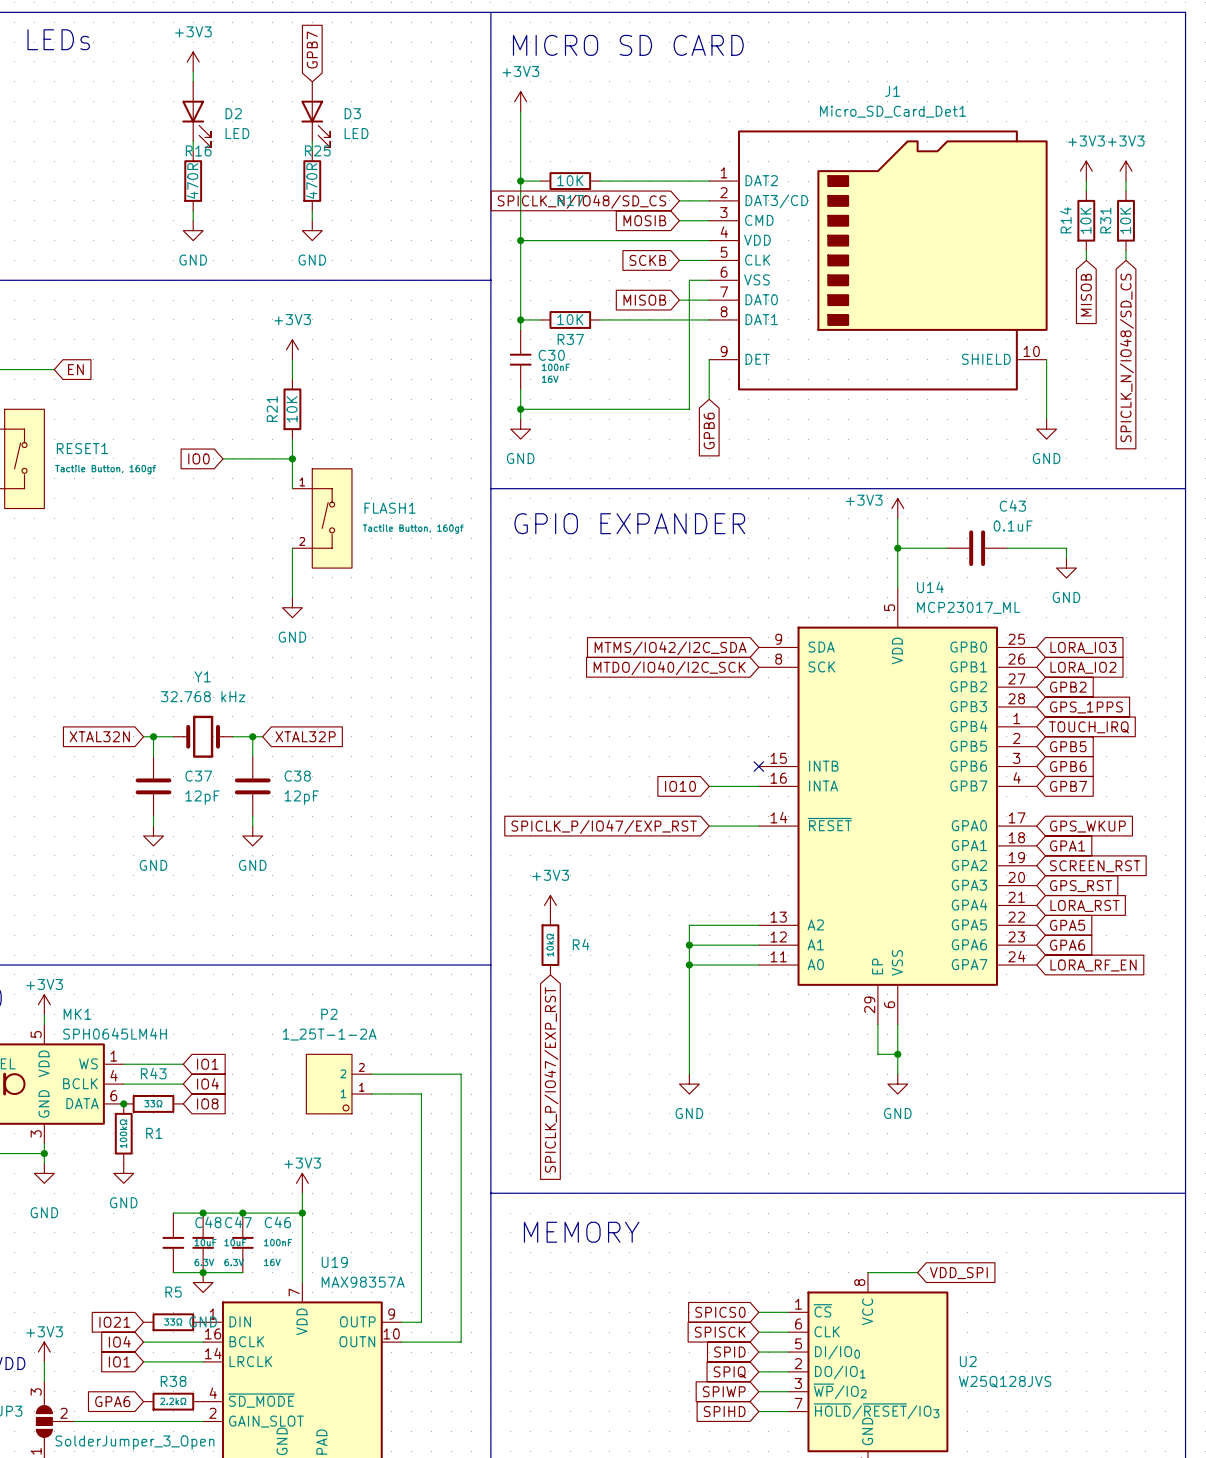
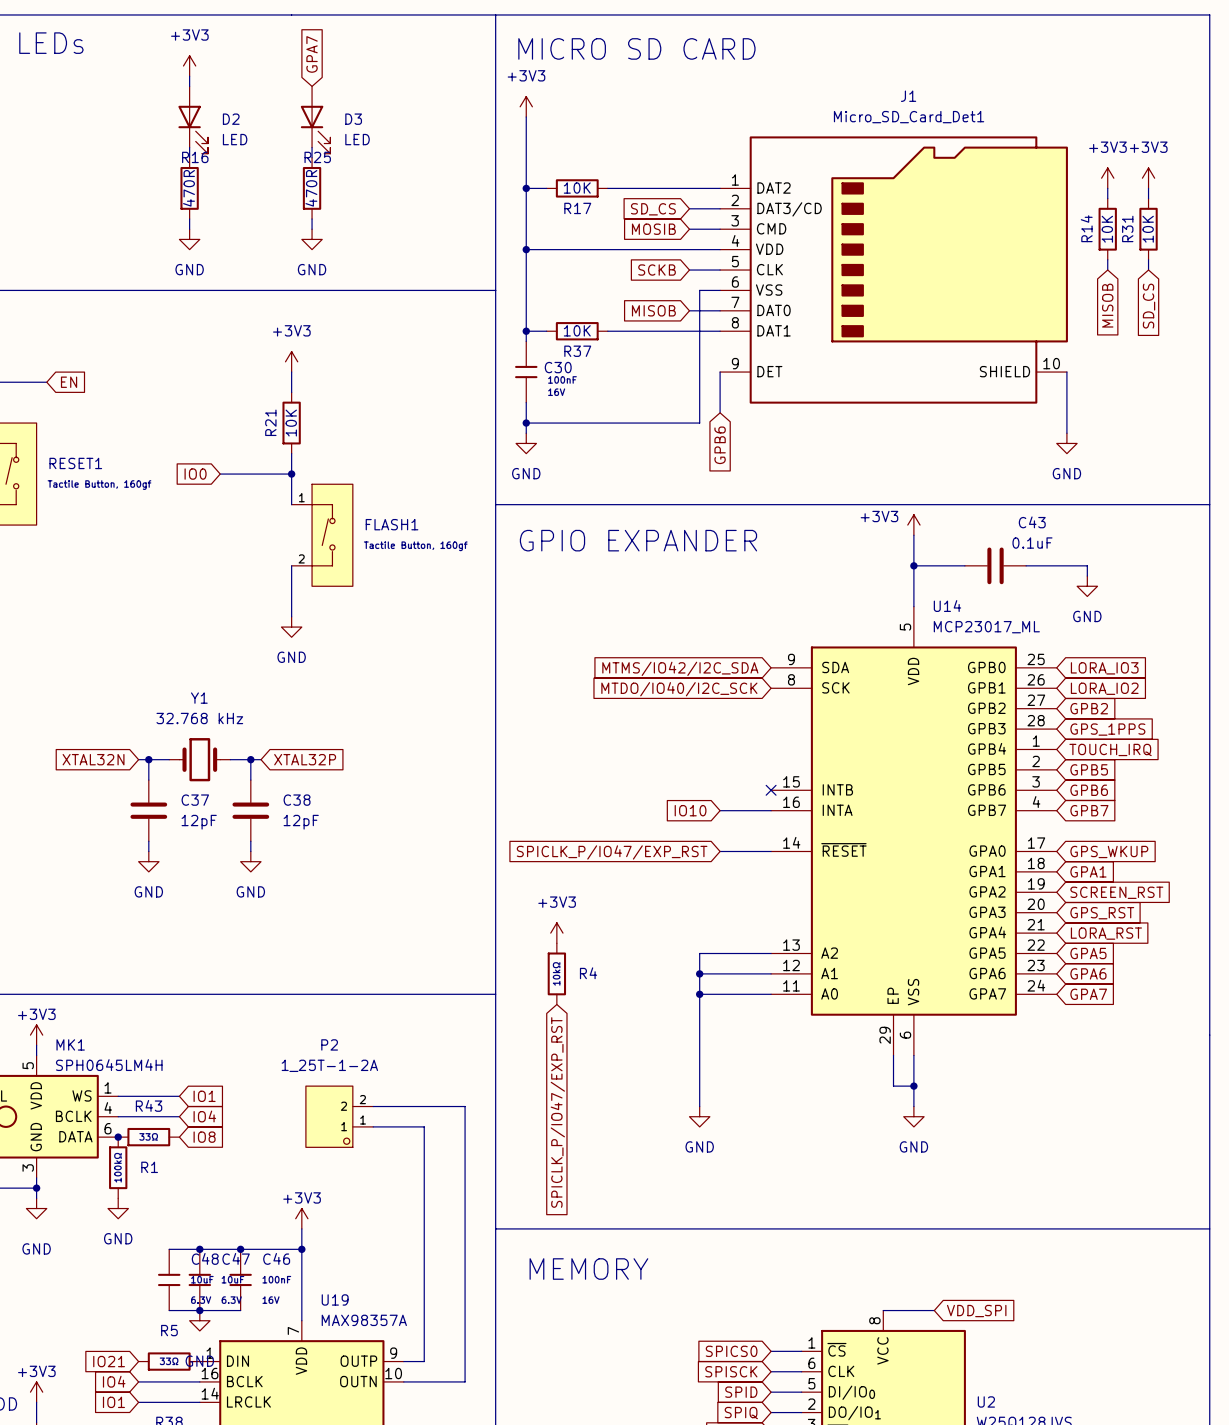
global label: GPB7 (312, 50) -> GPA7 (312, 54)
global label: SPICLK_N/IO48/SD_CS (581, 201) -> SD_CS (653, 209)
global label: SPICLK_N/IO48/SD_CS (1126, 357) -> SD_CS (1149, 306)
global label: LORA_RF_EN (1093, 965) -> GPA7 (1088, 994)

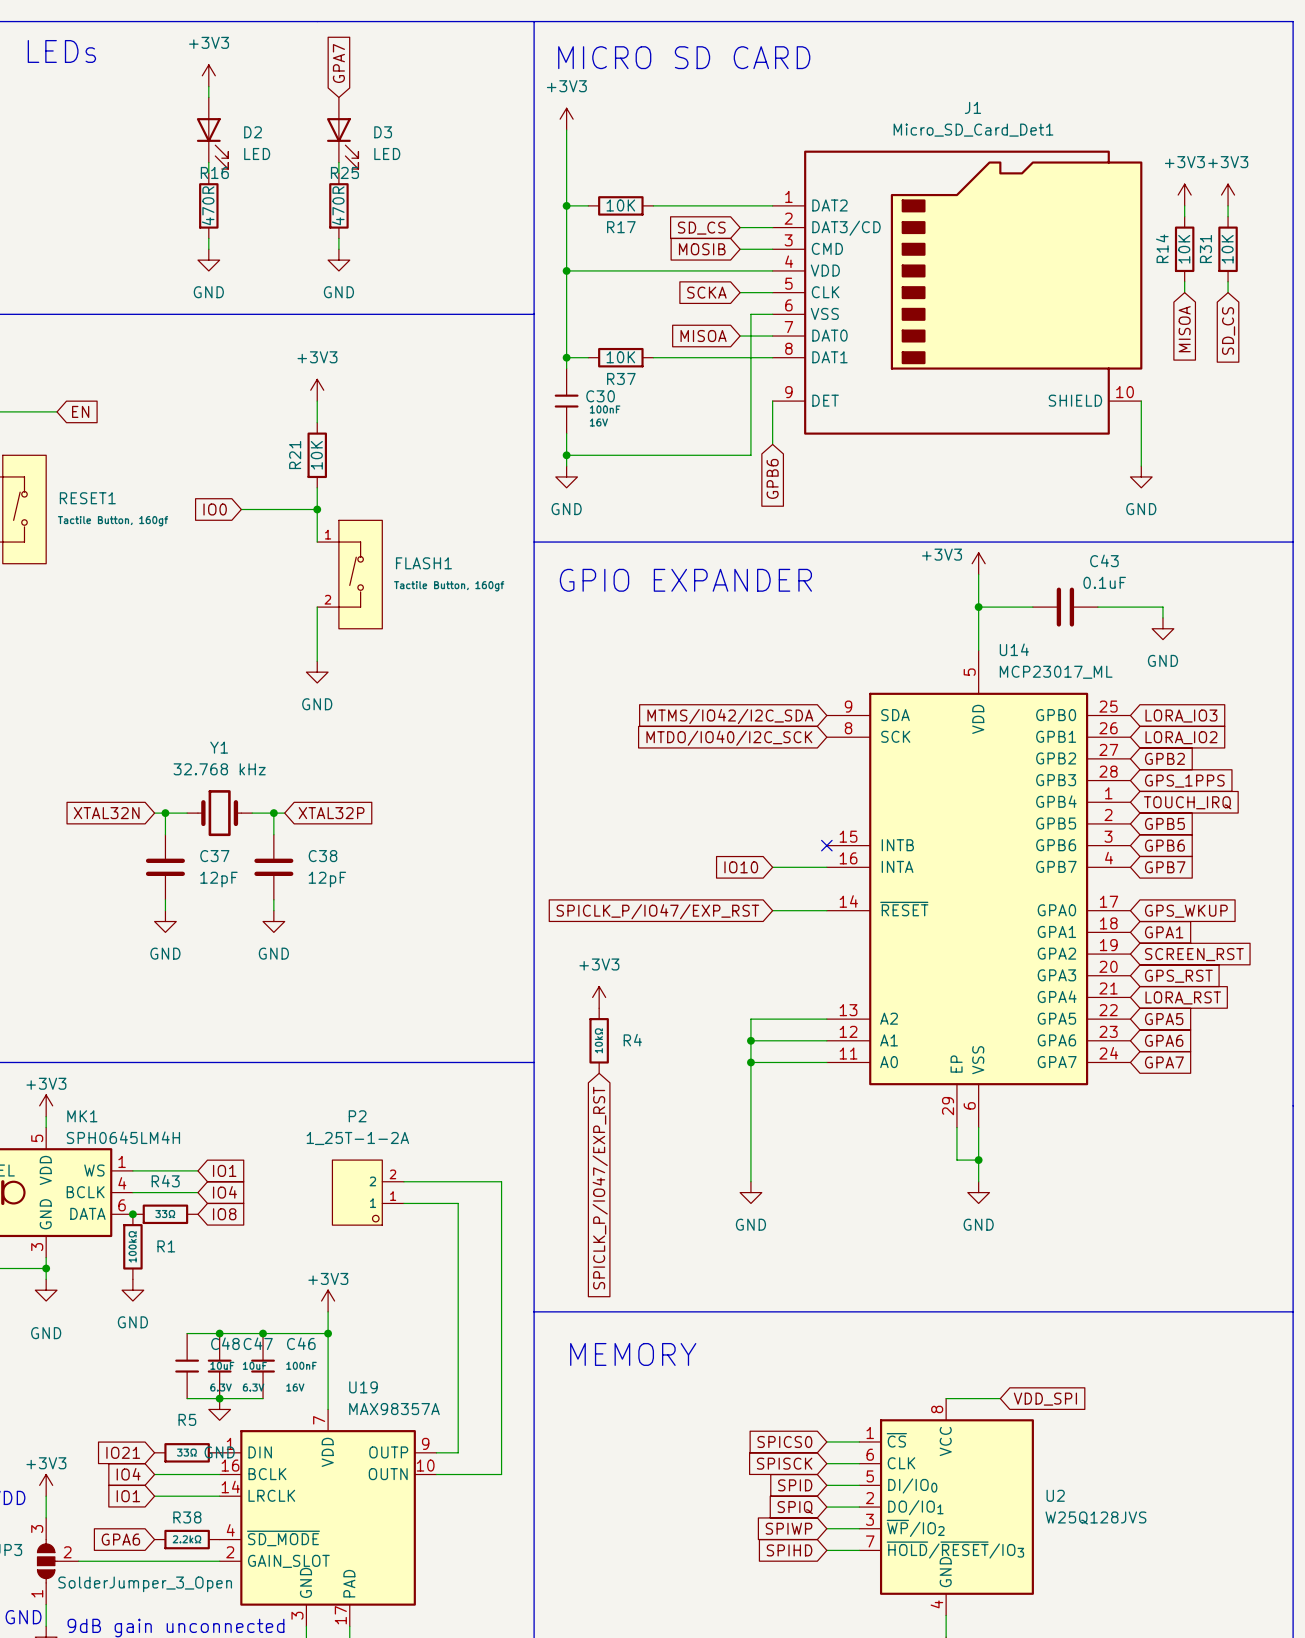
global label: SCKB (657, 270) -> SCKA (706, 292)
global label: MISOB (1107, 305) -> MISOA (1184, 329)
global label: MISOB (653, 310) -> MISOA (703, 336)

